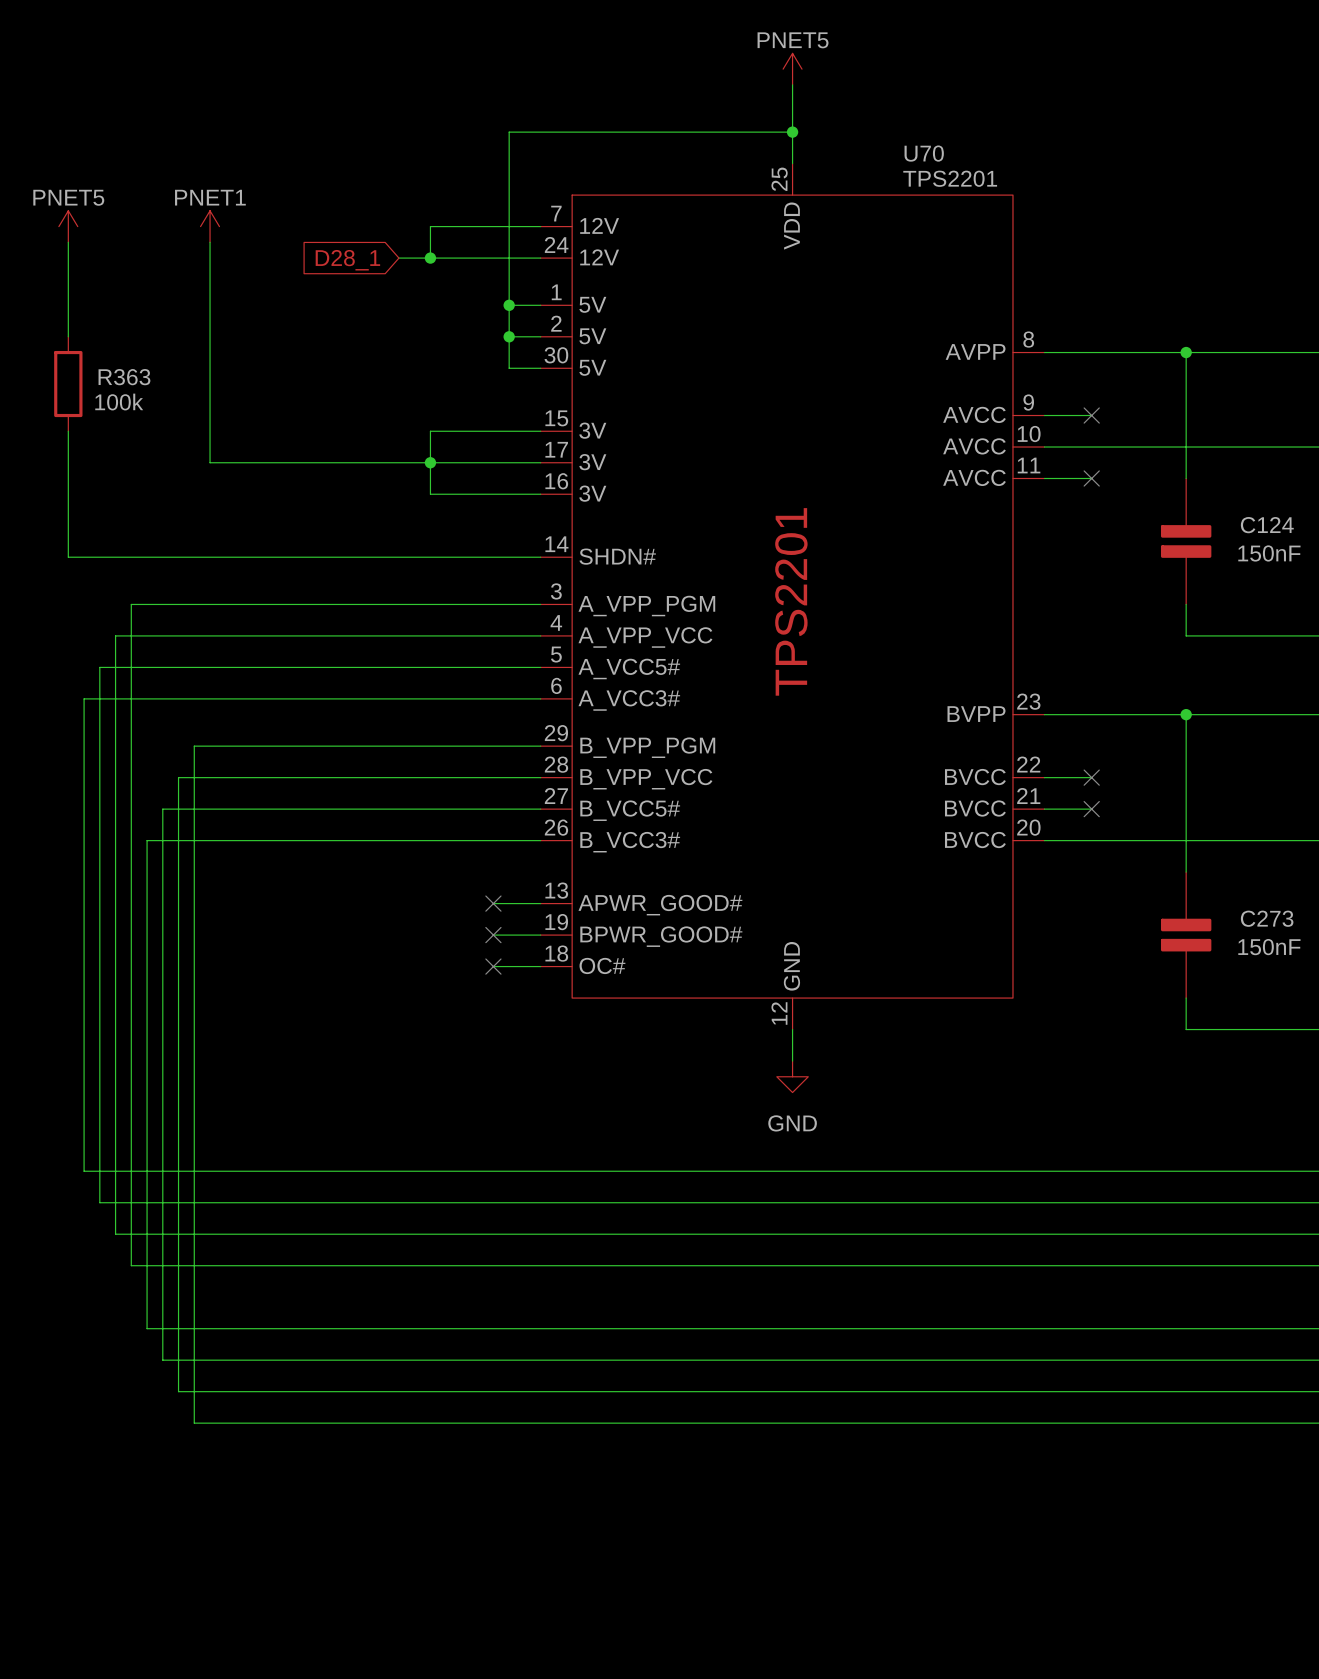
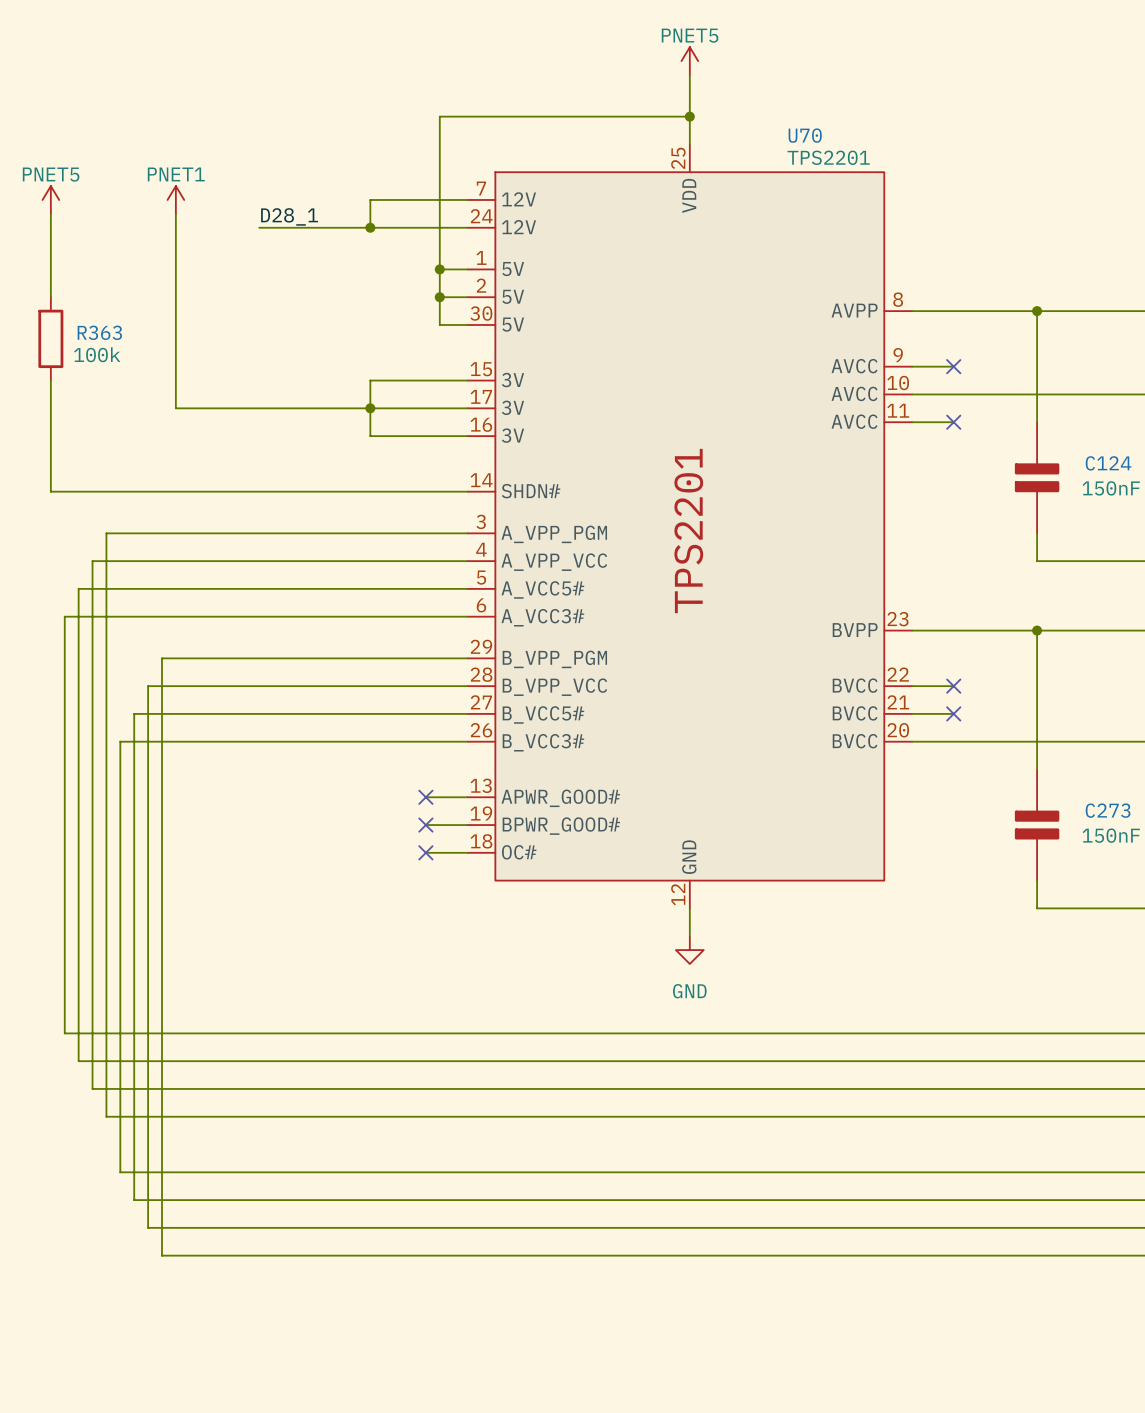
label: none -> D28_1 (289, 216)
wire: none -> (259, 227) (342, 227)
global label: D28_1 (347, 260) -> none

